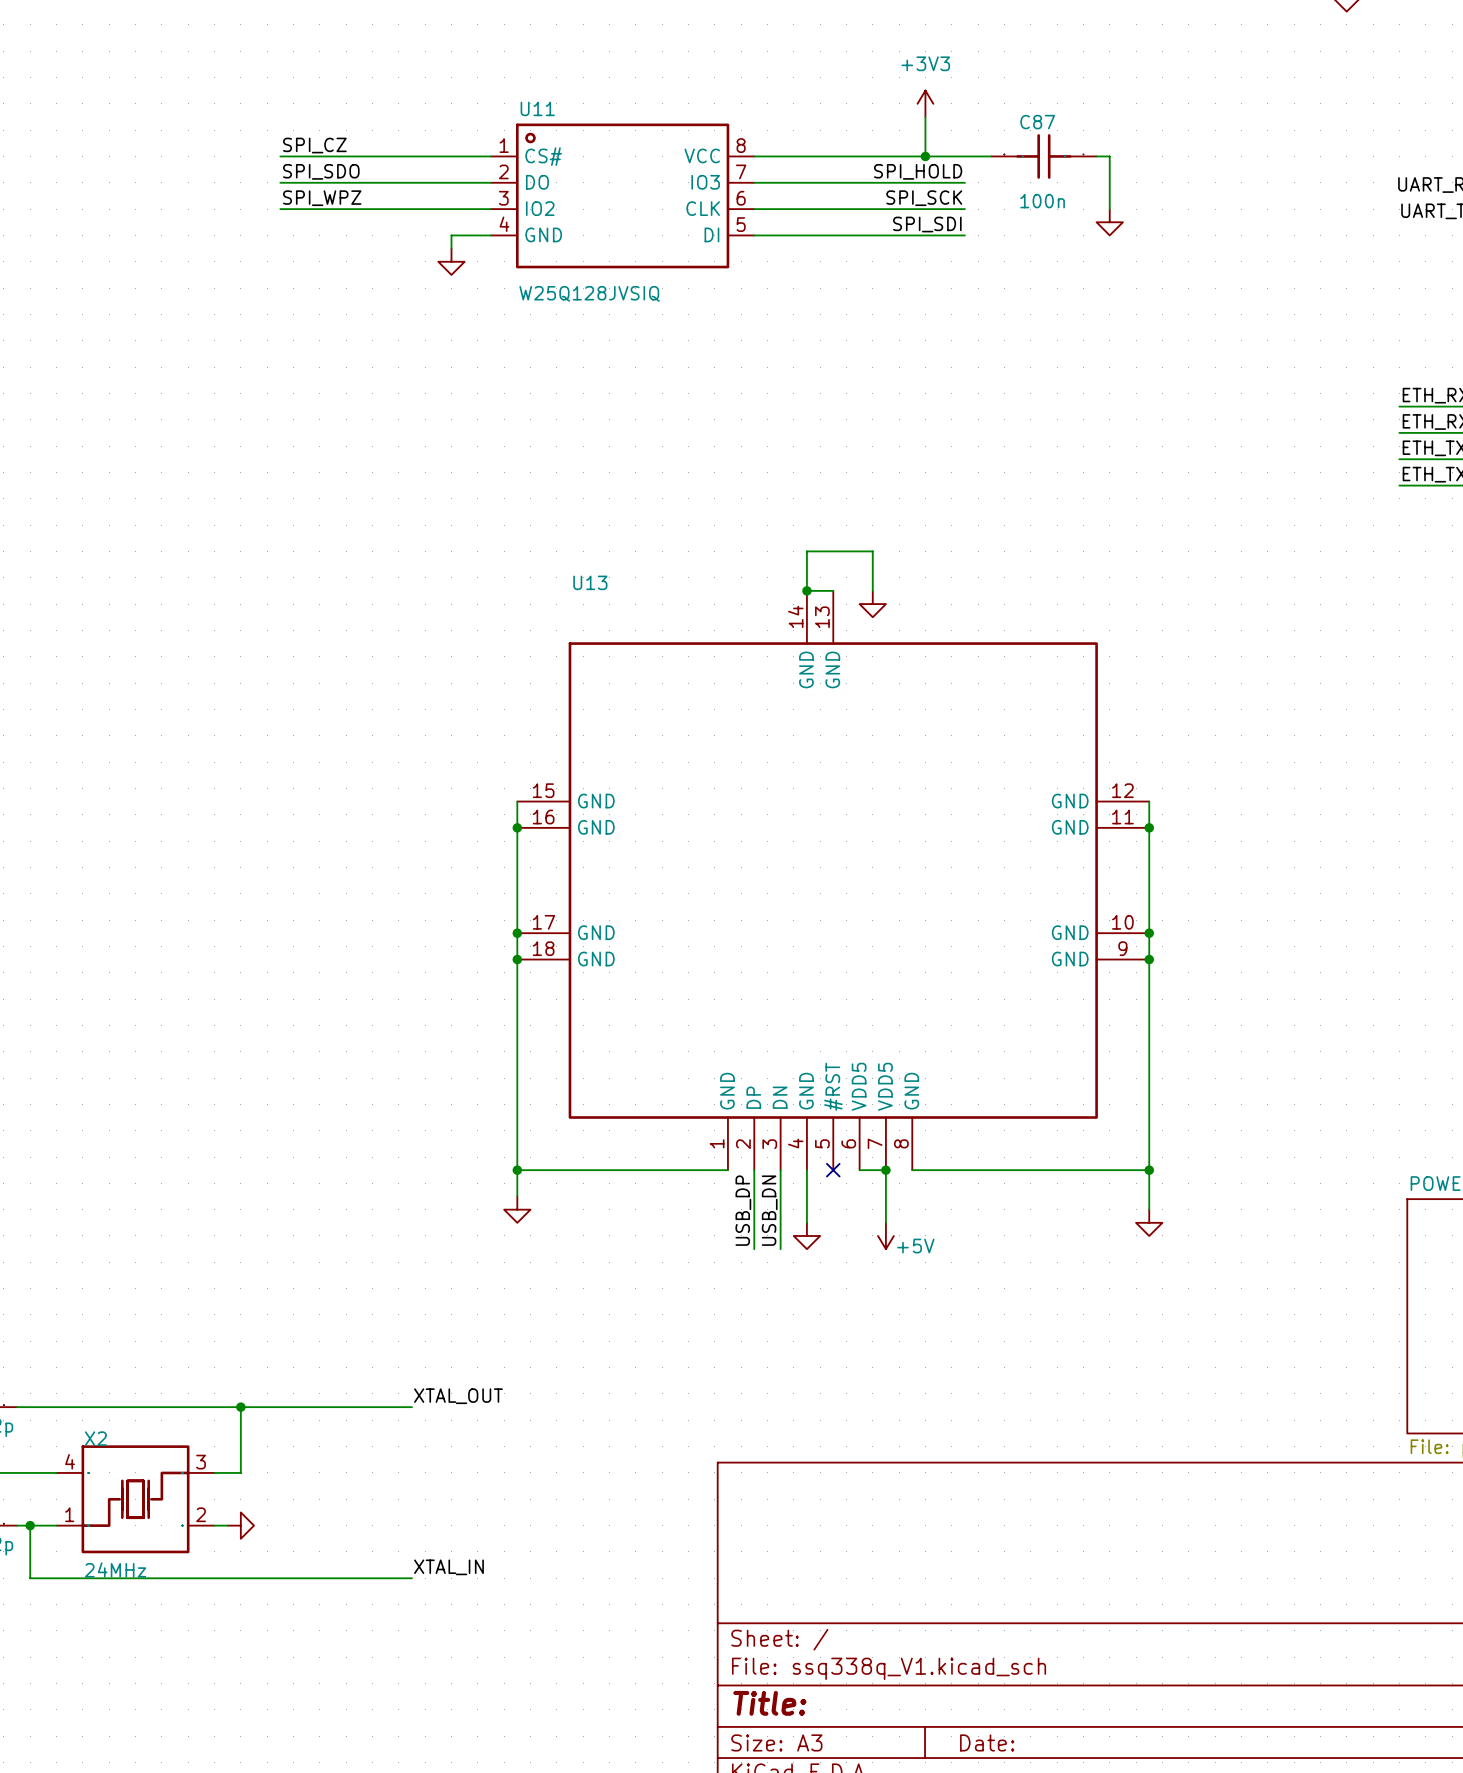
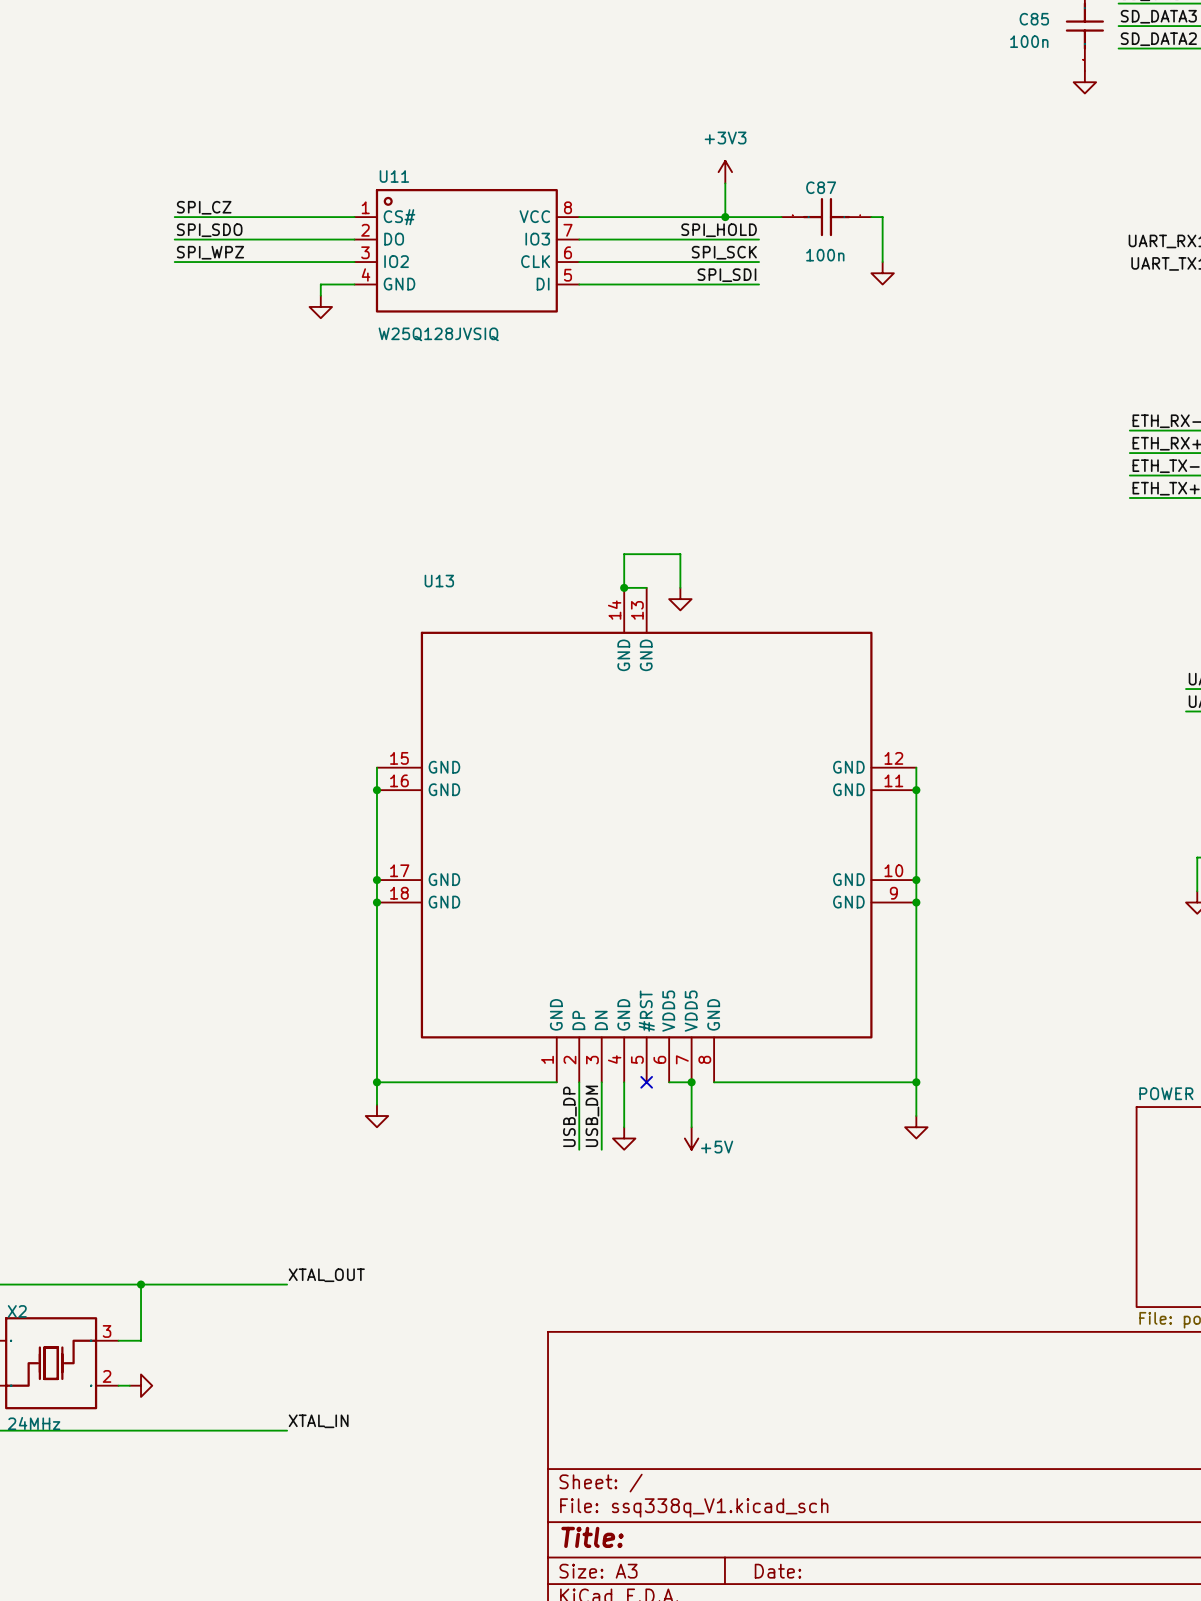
label: USB_DN (769, 1210) -> USB_DM (592, 1116)

